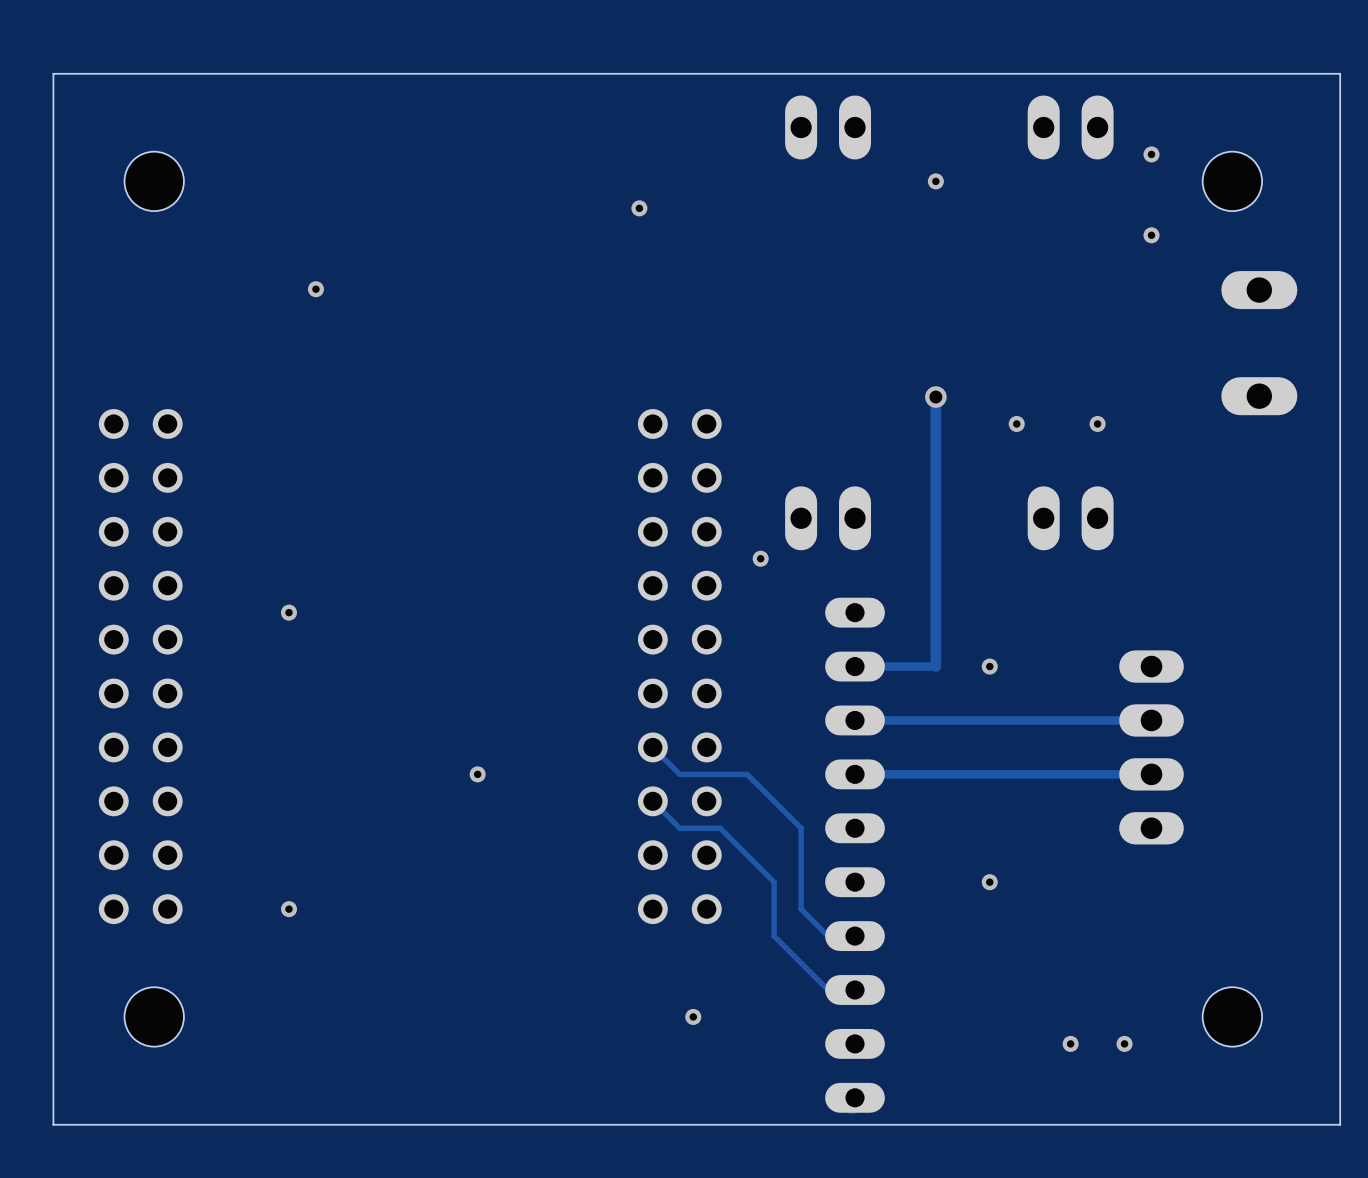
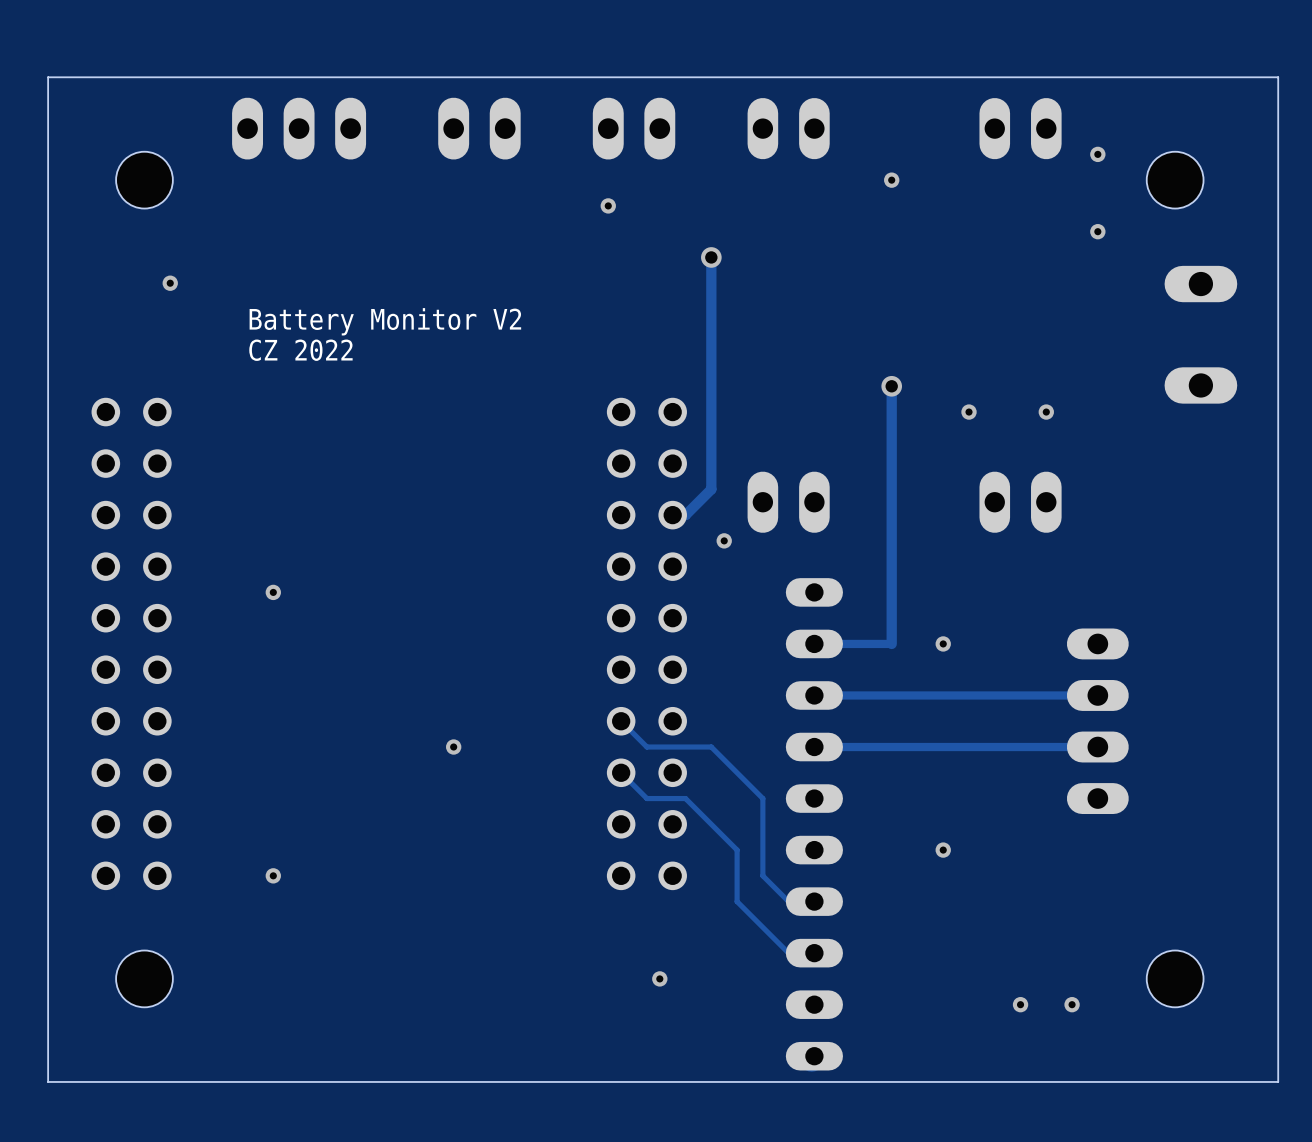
part: none -> (299, 128)
part: none -> (479, 128)
part: none -> (634, 128)
track: none -> (711, 257) (711, 489) (685, 515) (672, 515)
via: none -> (711, 257)
via: none -> (170, 283)
via: (315, 289) -> none
text: none -> Battery Monitor V2 (385, 321)
text: none -> CZ 2022 (300, 350)

